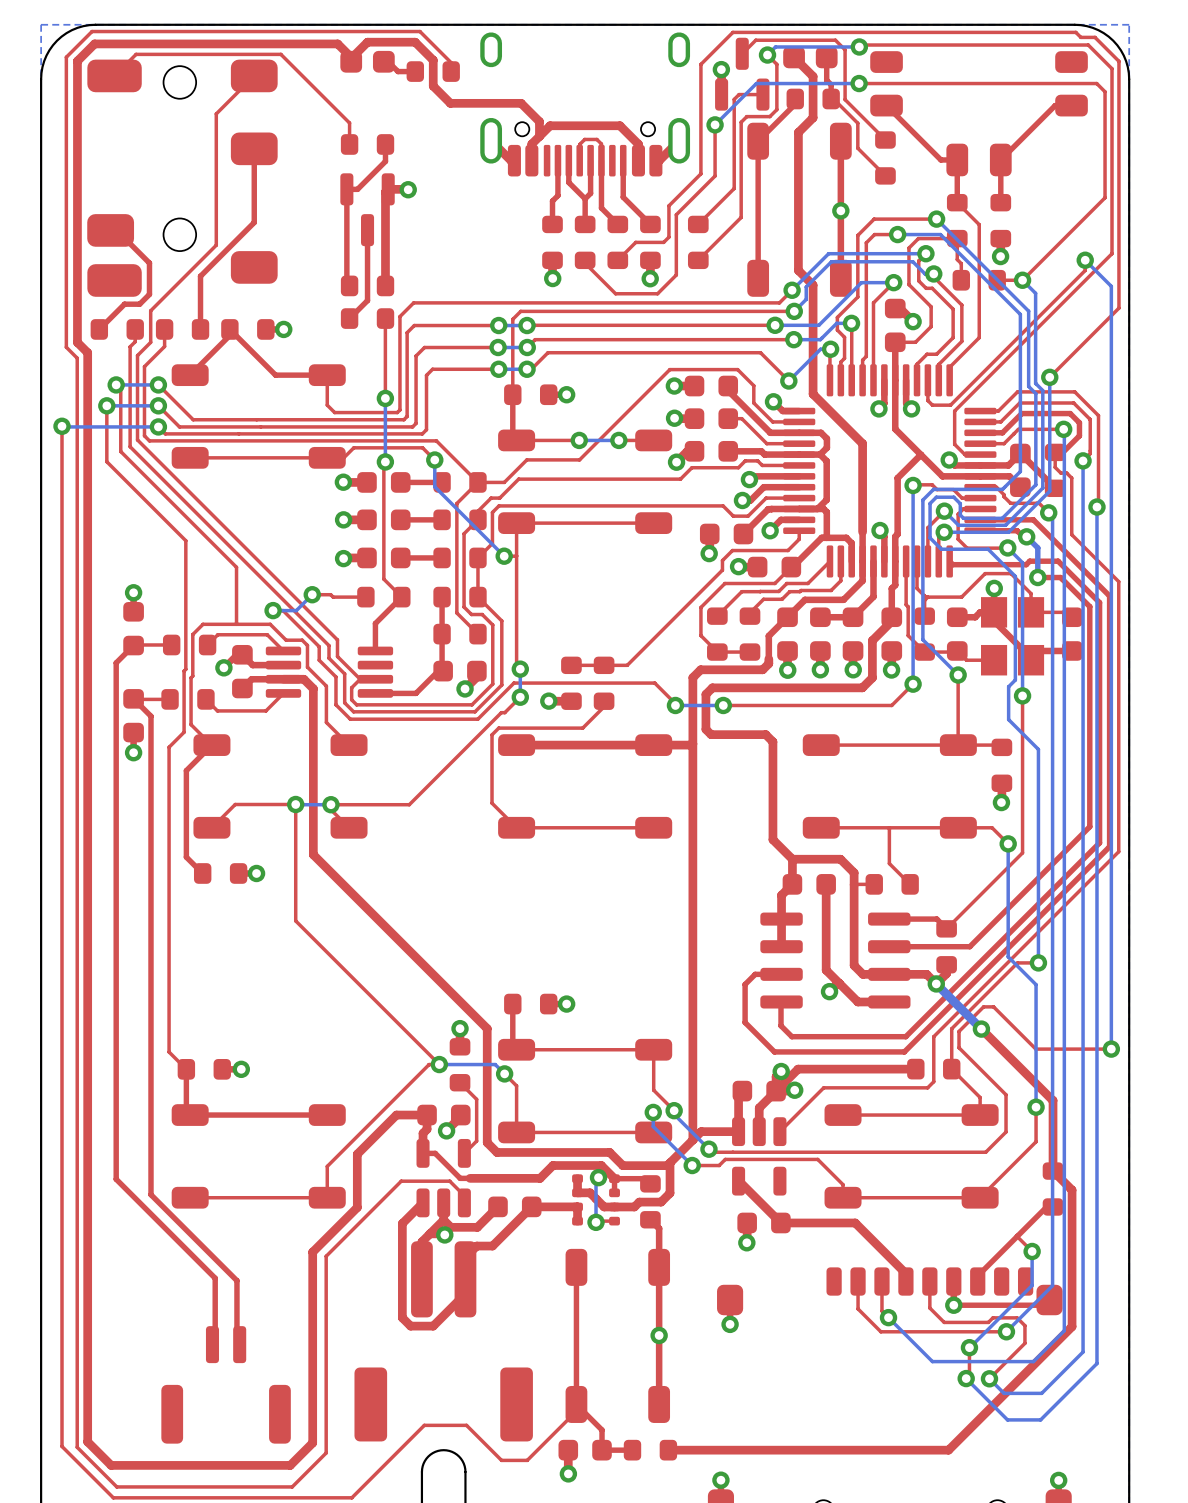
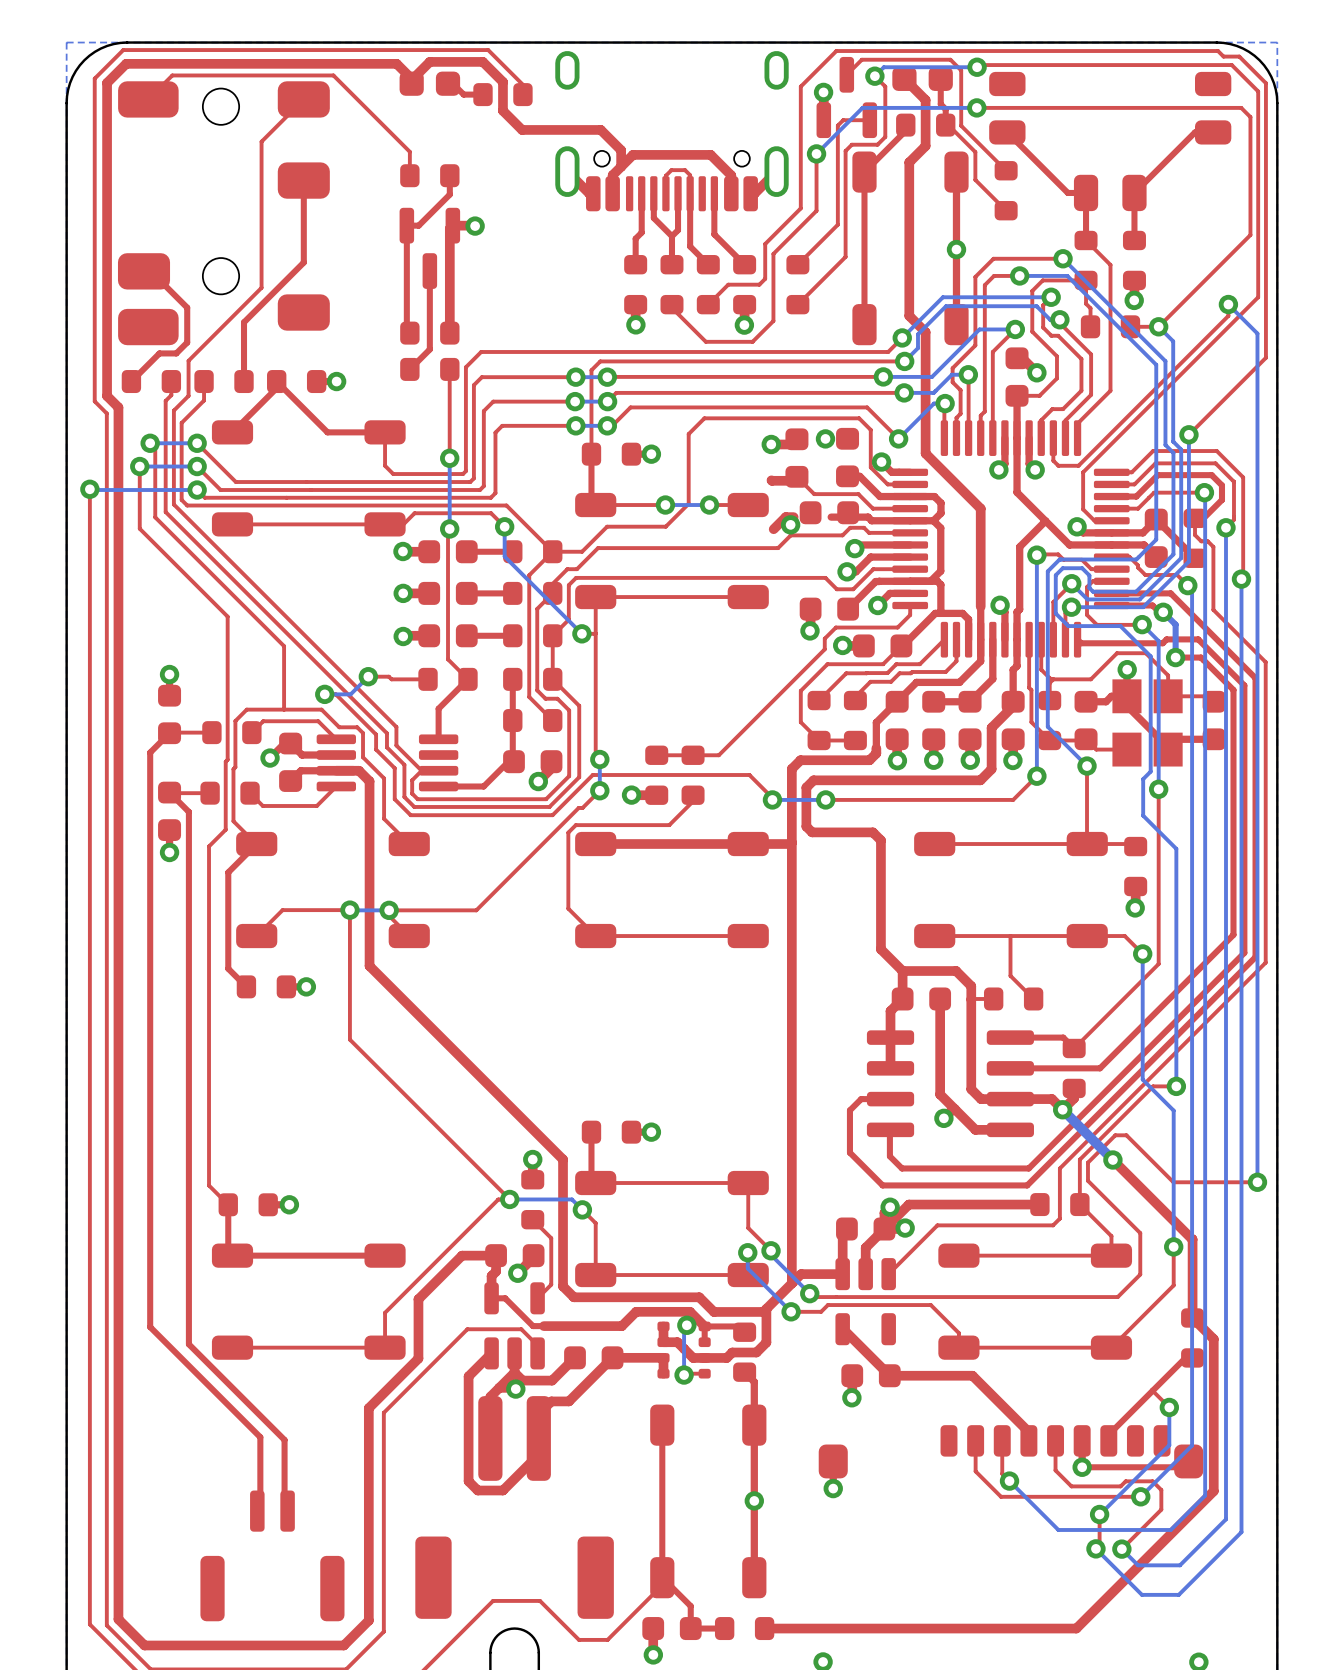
via: none -> (825, 438)
part: (711, 386) -> none
top track: (728, 386) (728, 390) (772, 432) -> (847, 476) (859, 476) (879, 496)
part: none -> (847, 457)
part: none -> (796, 458)
via: (674, 418) -> none
part: (711, 418) -> none
top track: (728, 418) (741, 418) (766, 443) -> (796, 476) (814, 494) (858, 494) (874, 508)
top track: (779, 421) (772, 421) (753, 403) (753, 385) (737, 369) (669, 369) (600, 439) -> (887, 484) (870, 467) (870, 429) (859, 418) (704, 418) (688, 434) (688, 503)
part position: (711, 451) -> (829, 512)
via position: (676, 462) -> (790, 524)

